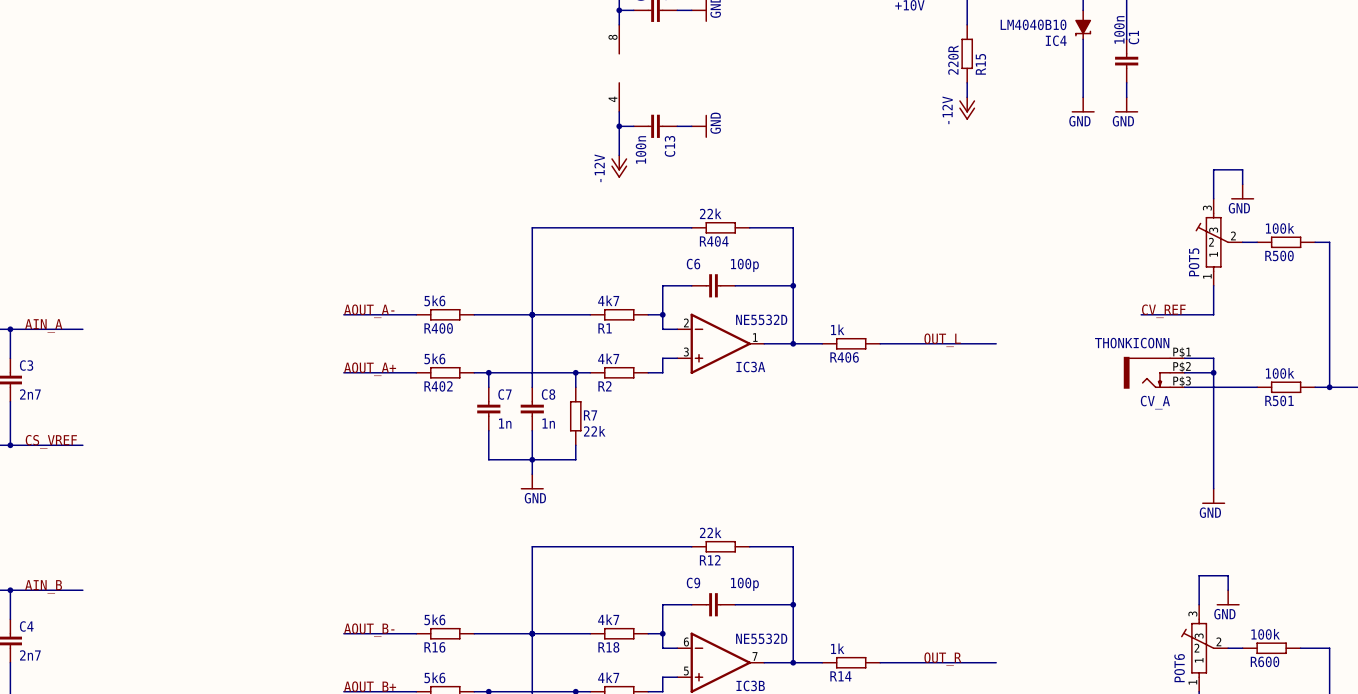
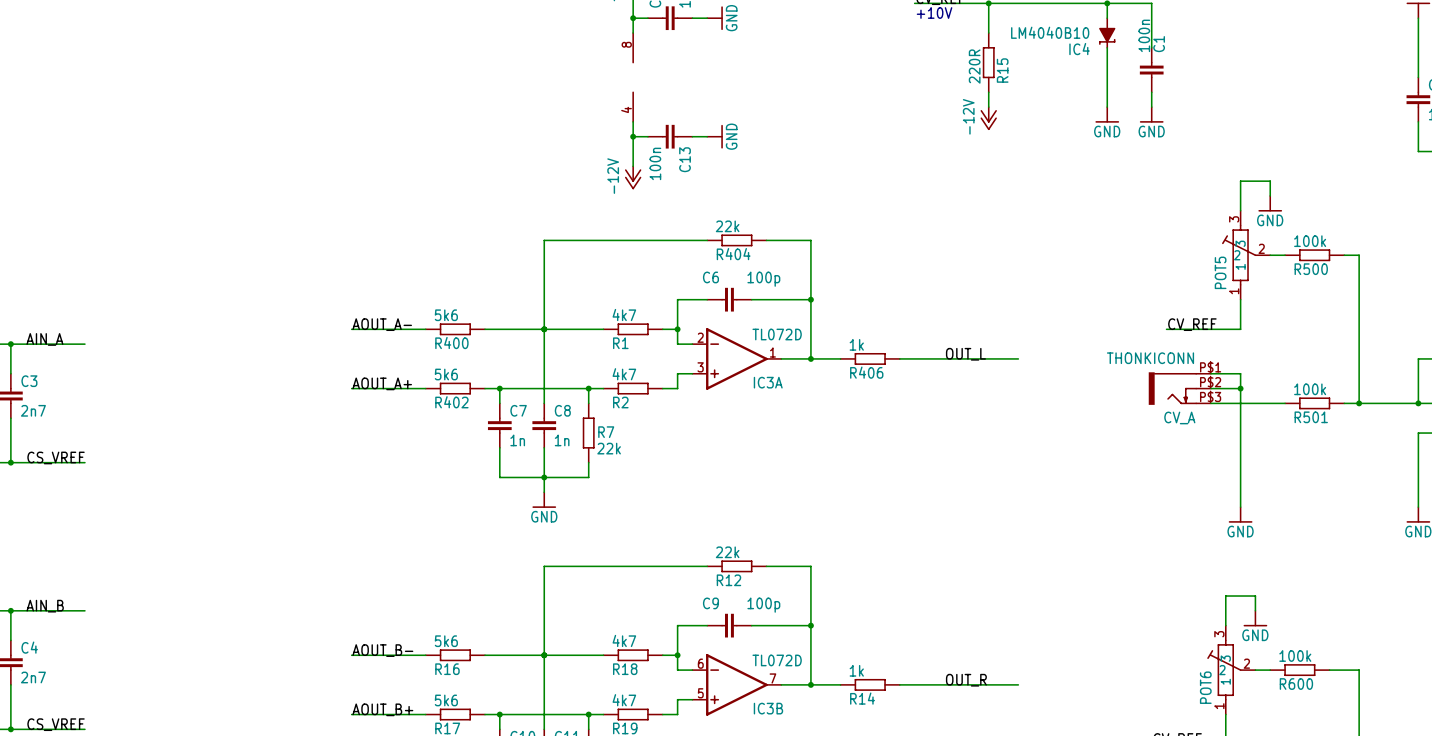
IC3A value: NE5532D (761, 319) -> TL072D (777, 334)
IC3B value: NE5532D (761, 638) -> TL072D (777, 660)

